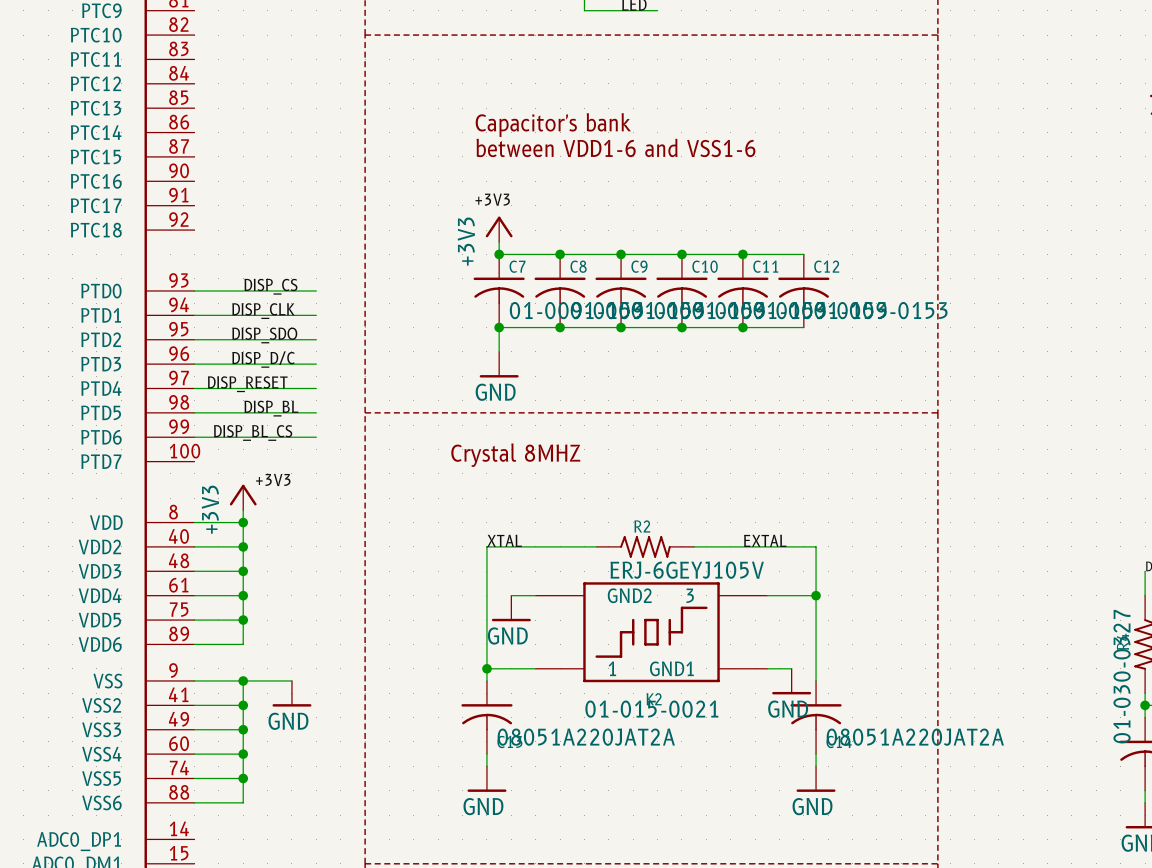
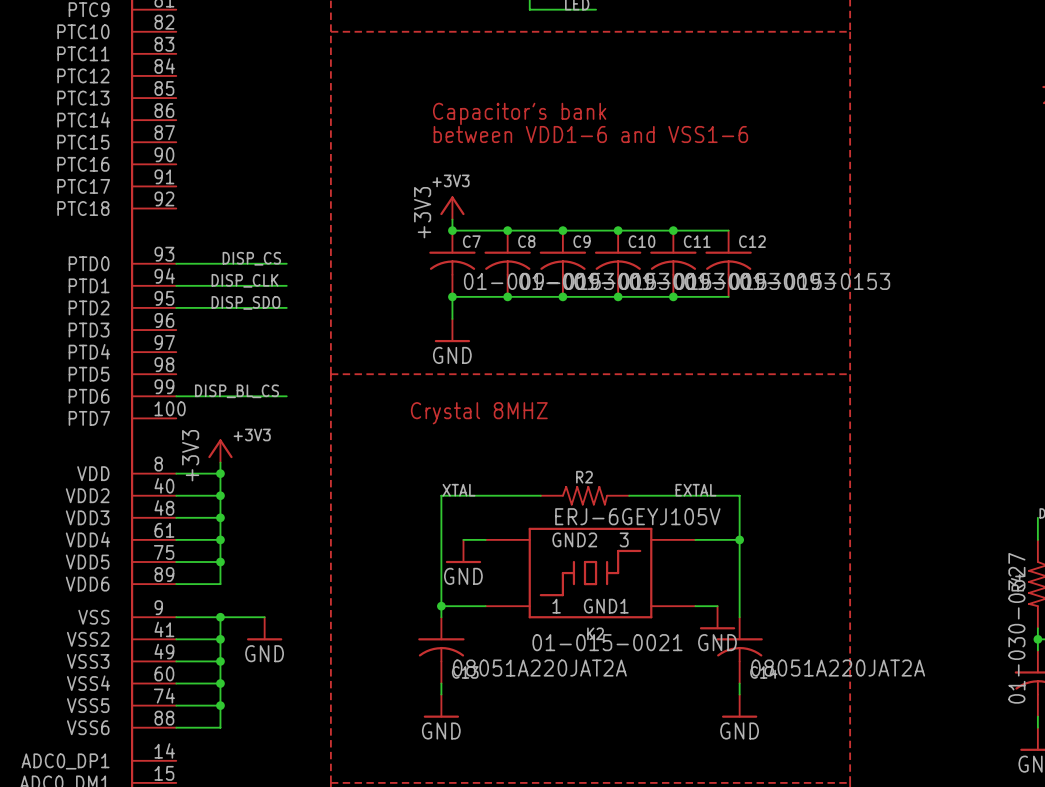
label: DISP_D/C (263, 359) -> none
wire: (194, 364) (316, 364) -> none
label: DISP_RESET (247, 384) -> none
wire: (194, 388) (316, 388) -> none
label: DISP_BL (271, 408) -> none
wire: (194, 412) (316, 412) -> none

